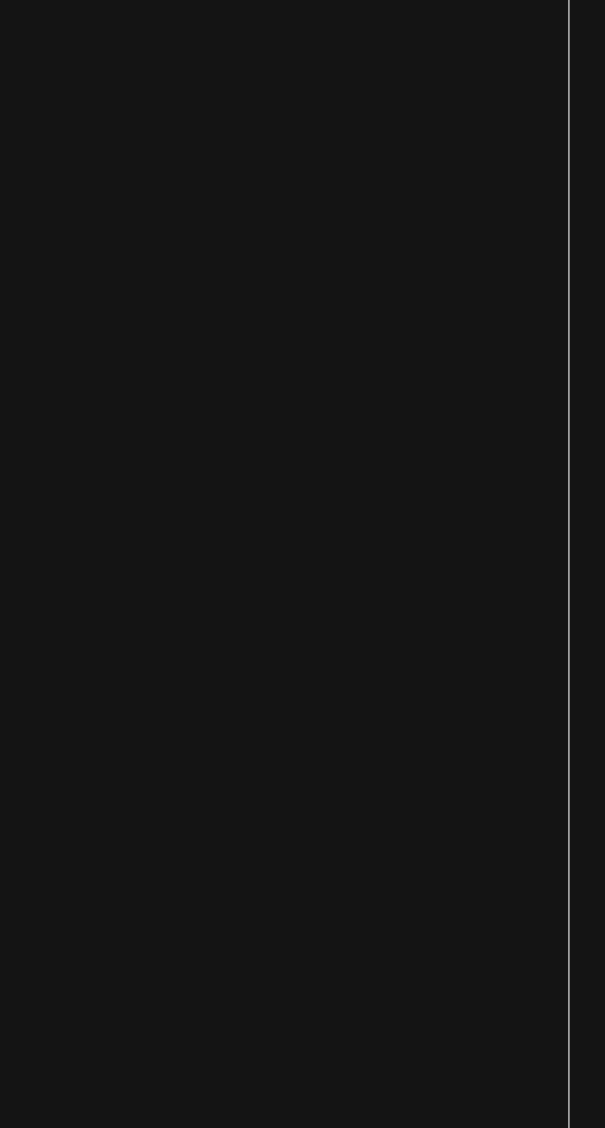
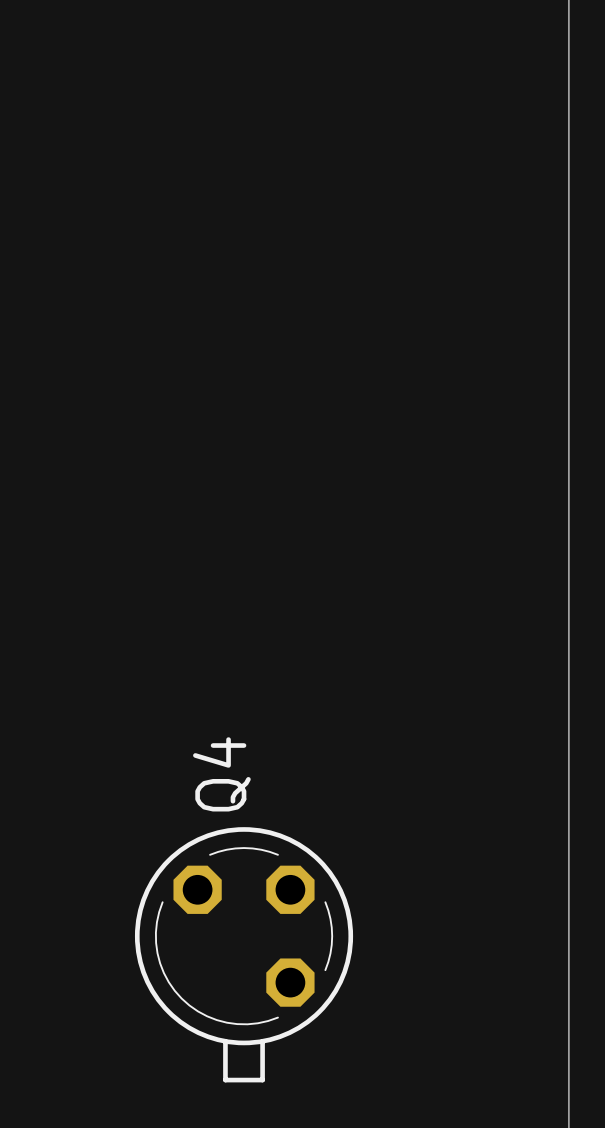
Q4: none -> (244, 954)

